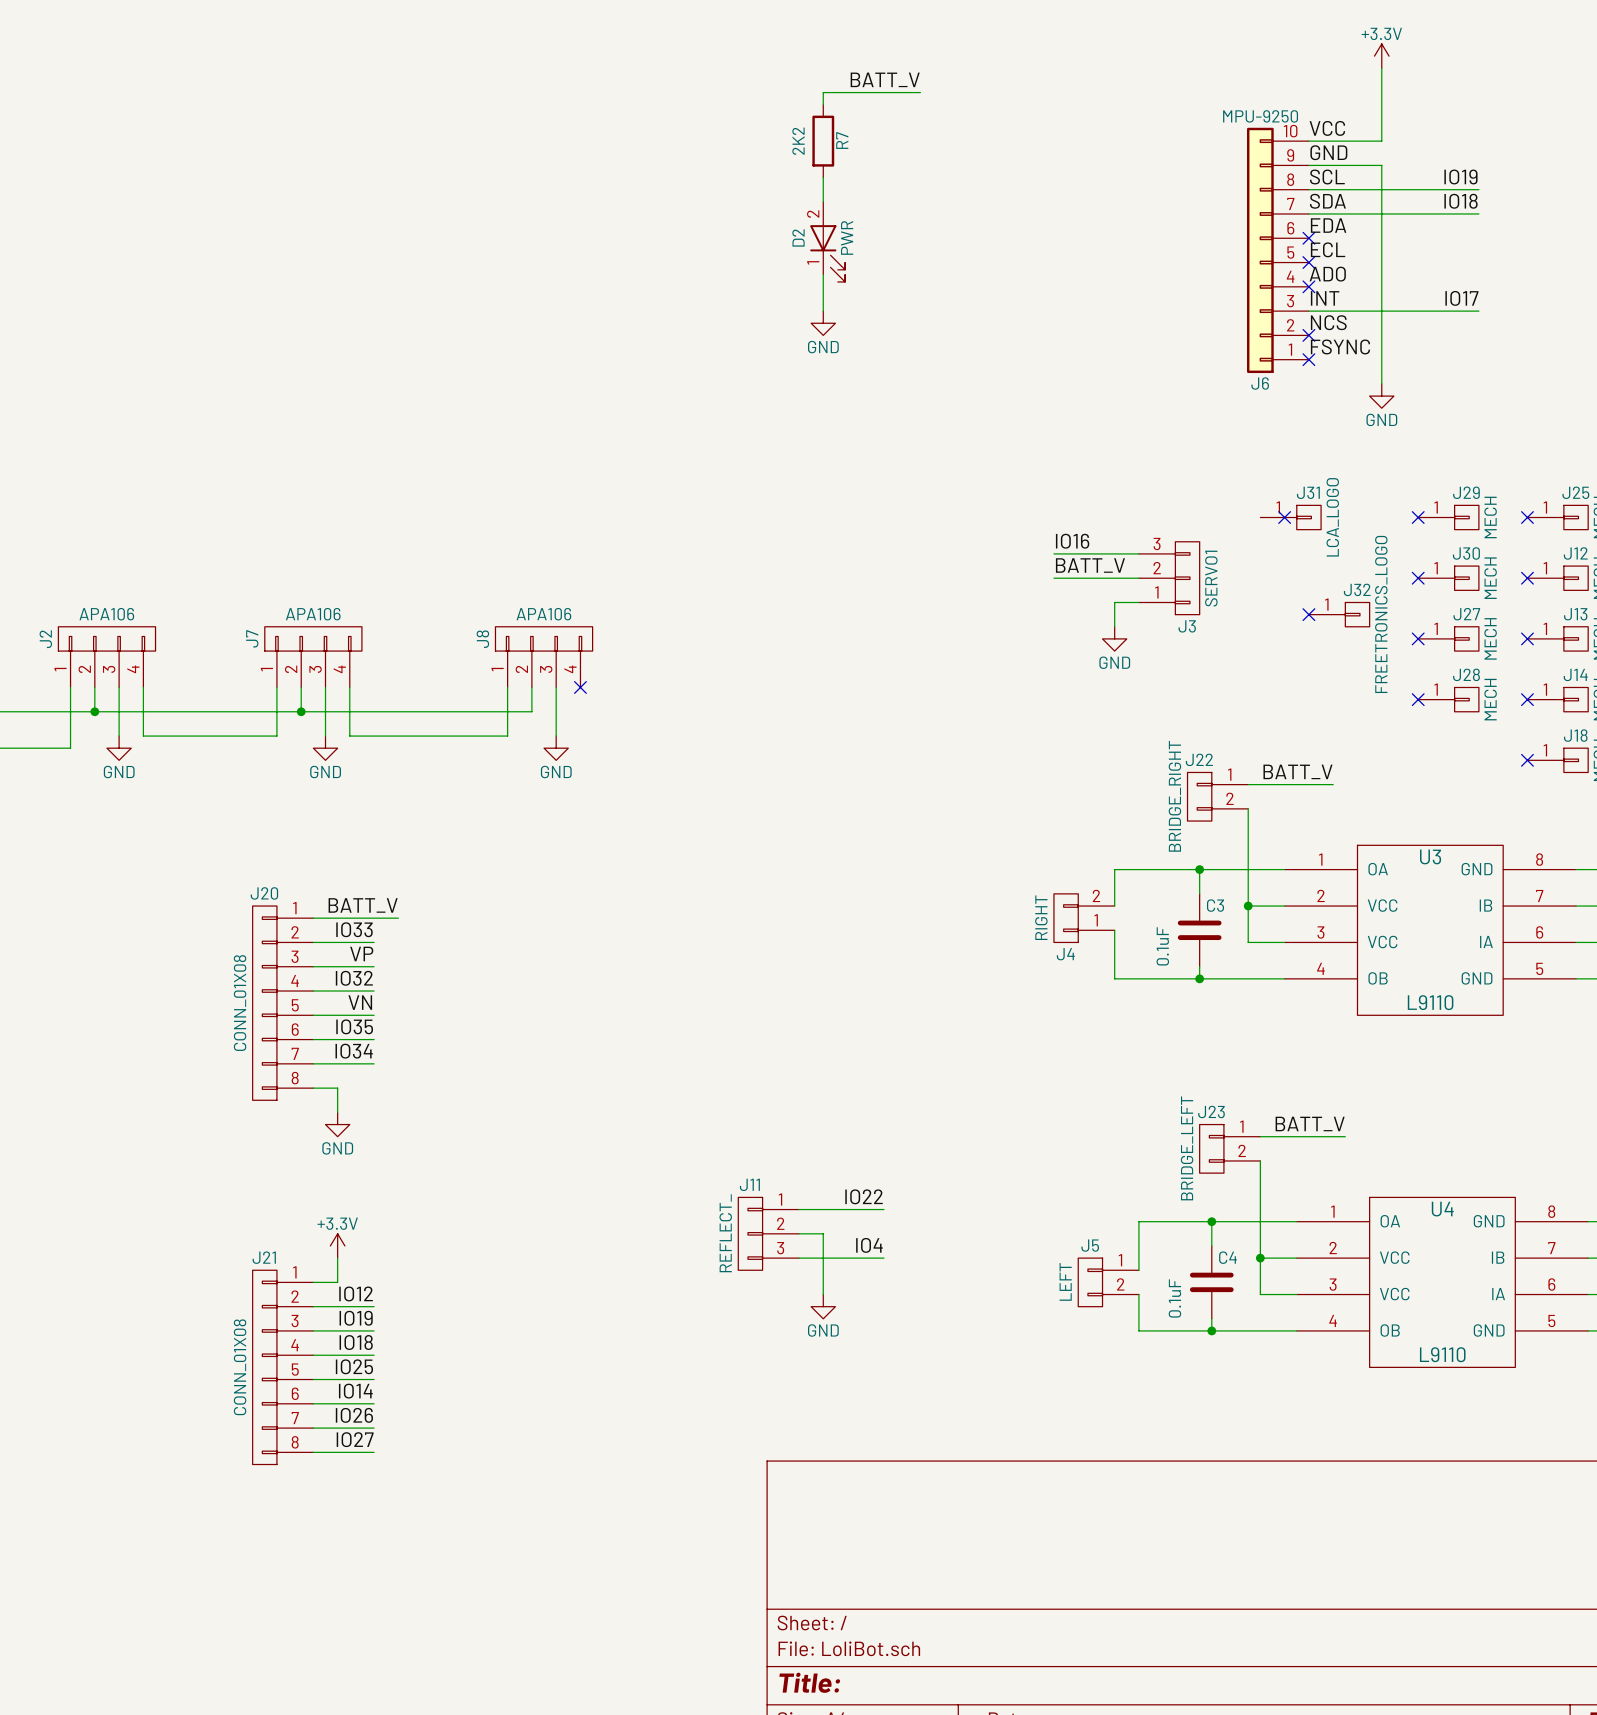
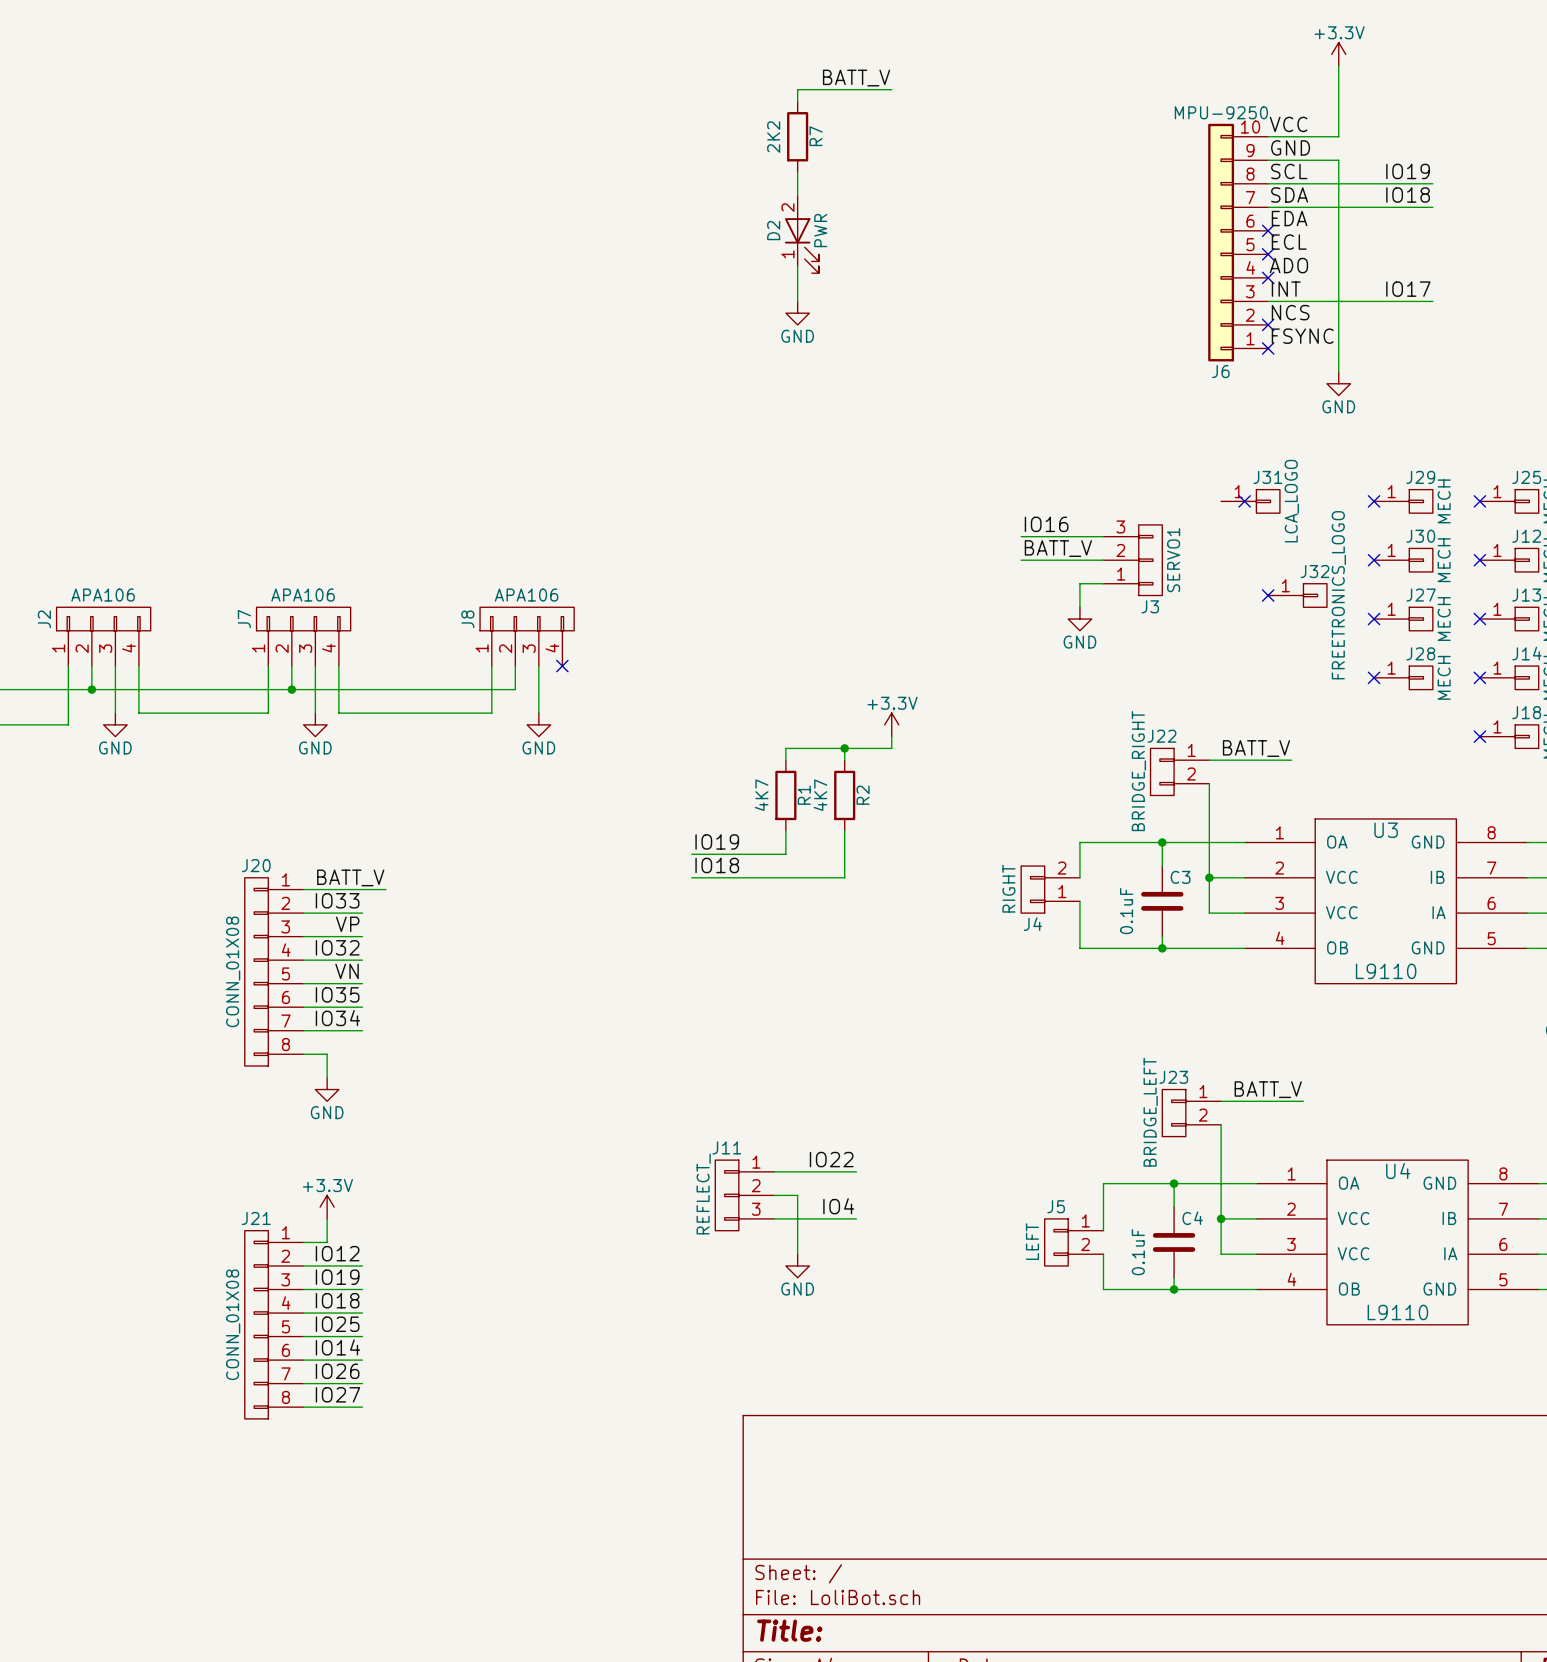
power symbol: none -> +3.3V (891, 724)
wire: none -> (891, 736) (891, 748) (785, 748) (785, 760)
wire: none -> (844, 748) (844, 760)
junction: none -> (844, 748)
R1: none -> 4K7 (785, 795)
R2: none -> 4K7 (844, 795)
wire: none -> (785, 830) (785, 854) (691, 854)
wire: none -> (844, 830) (844, 877) (691, 877)
label: none -> IO19 (717, 841)
label: none -> IO18 (717, 865)

